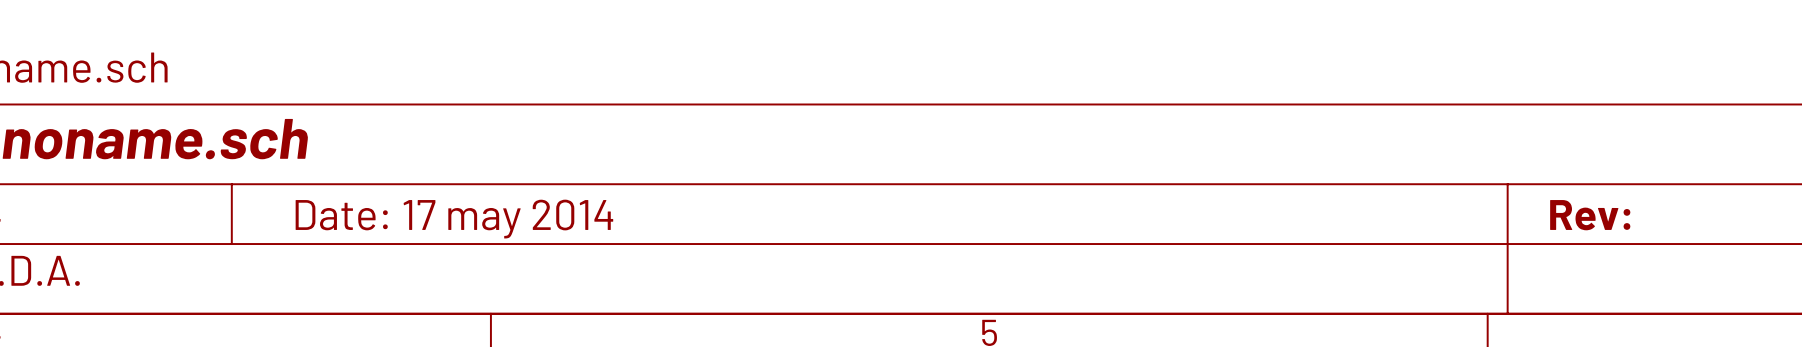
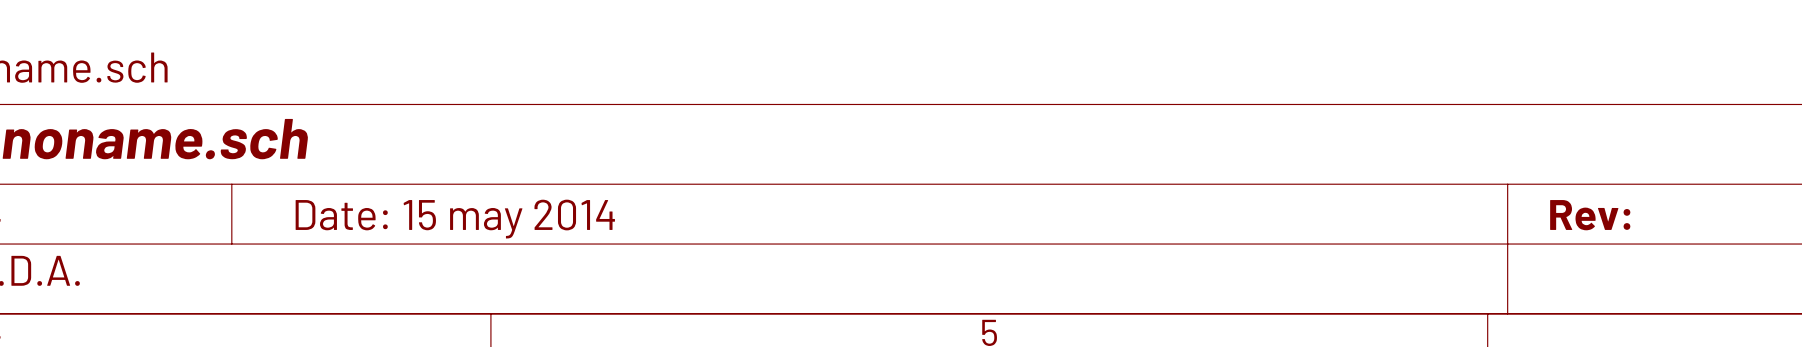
title block: Date: 17 may 2014 (454, 219) -> Date: 15 may 2014 (455, 219)

